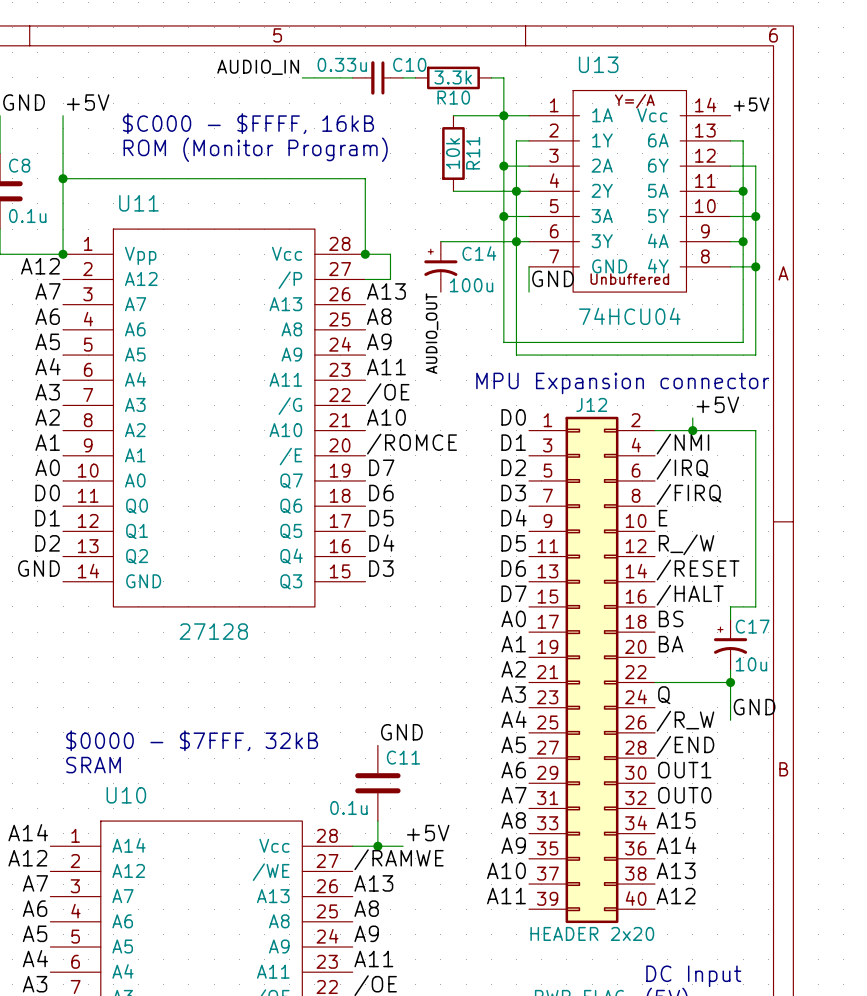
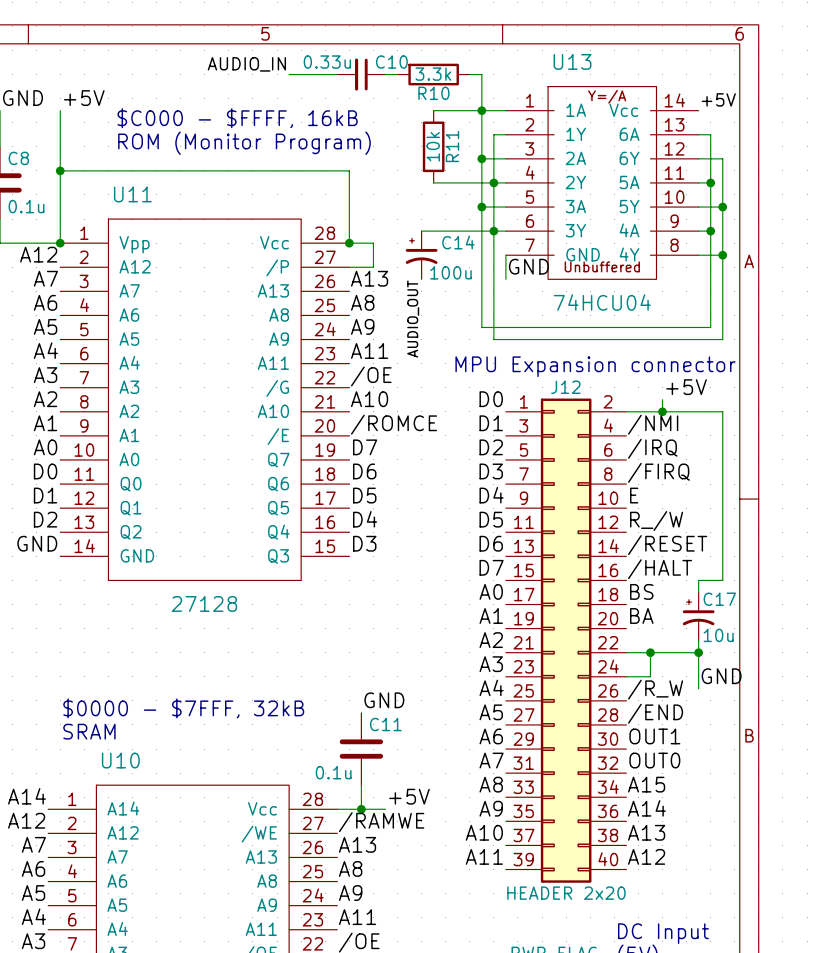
wire: none -> (650, 652) (650, 676) (626, 676)
junction: none -> (650, 652)
label: Q (664, 695) -> none

